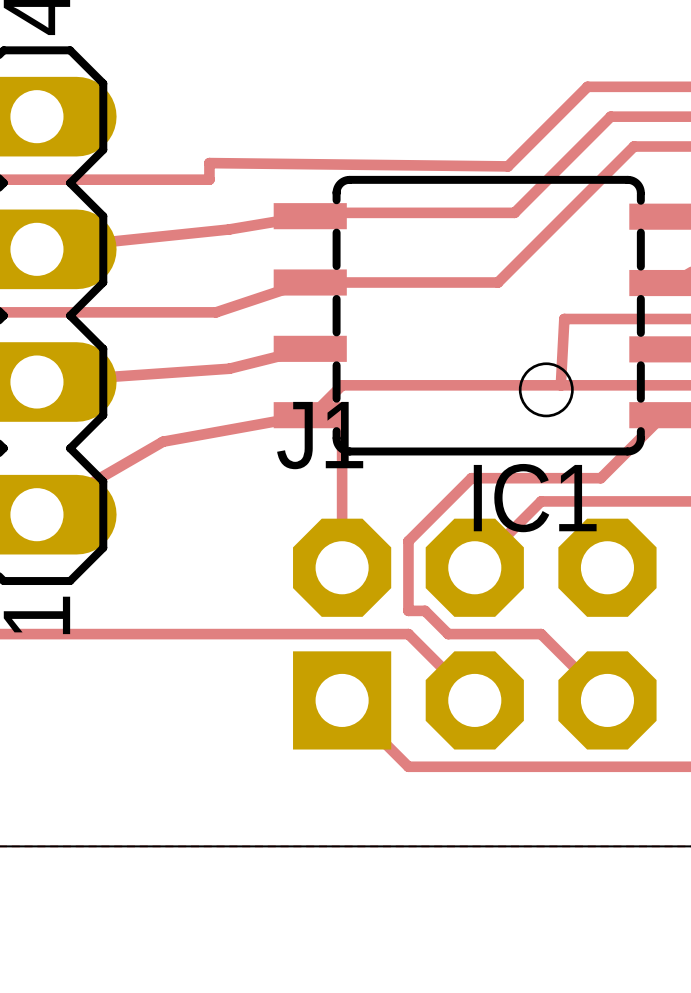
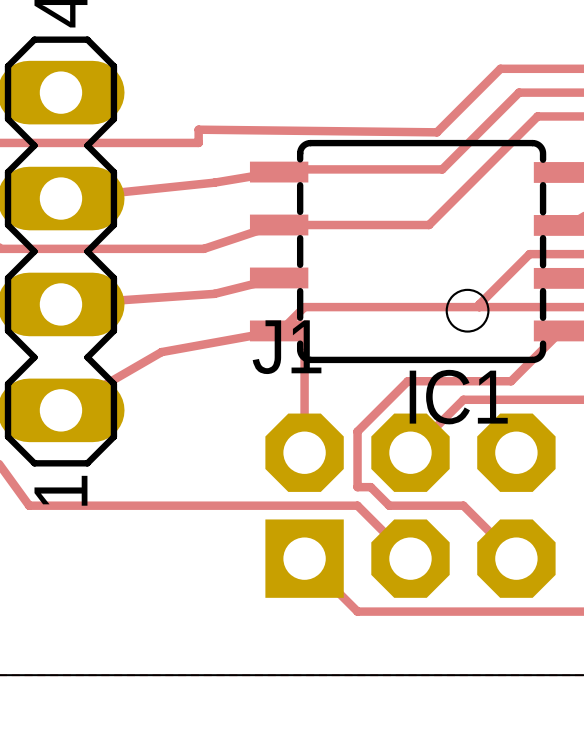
top track: (624, 318) (564, 318) (561, 382) -> (529, 254) (479, 304)

